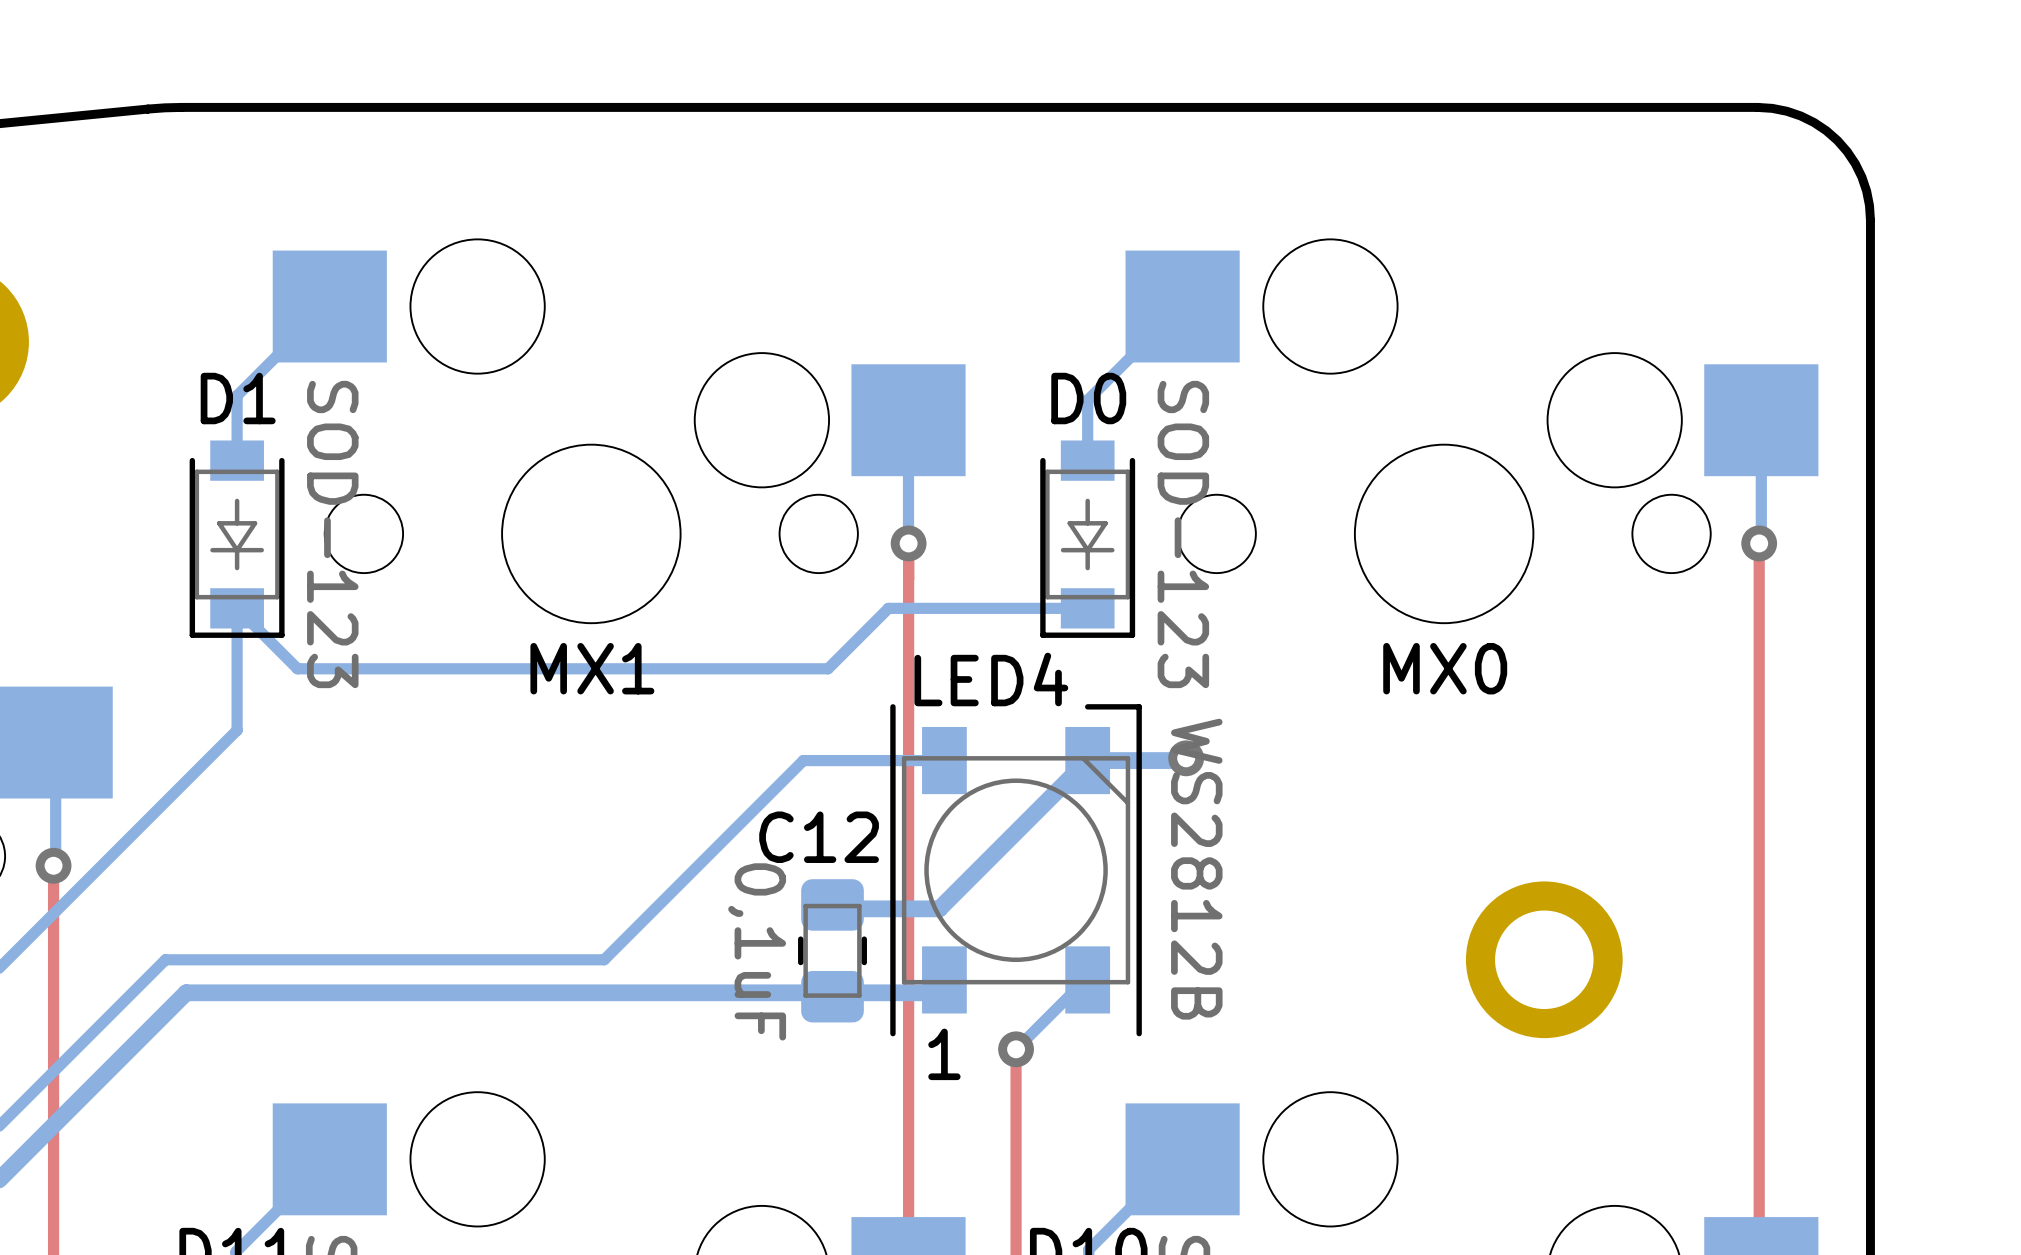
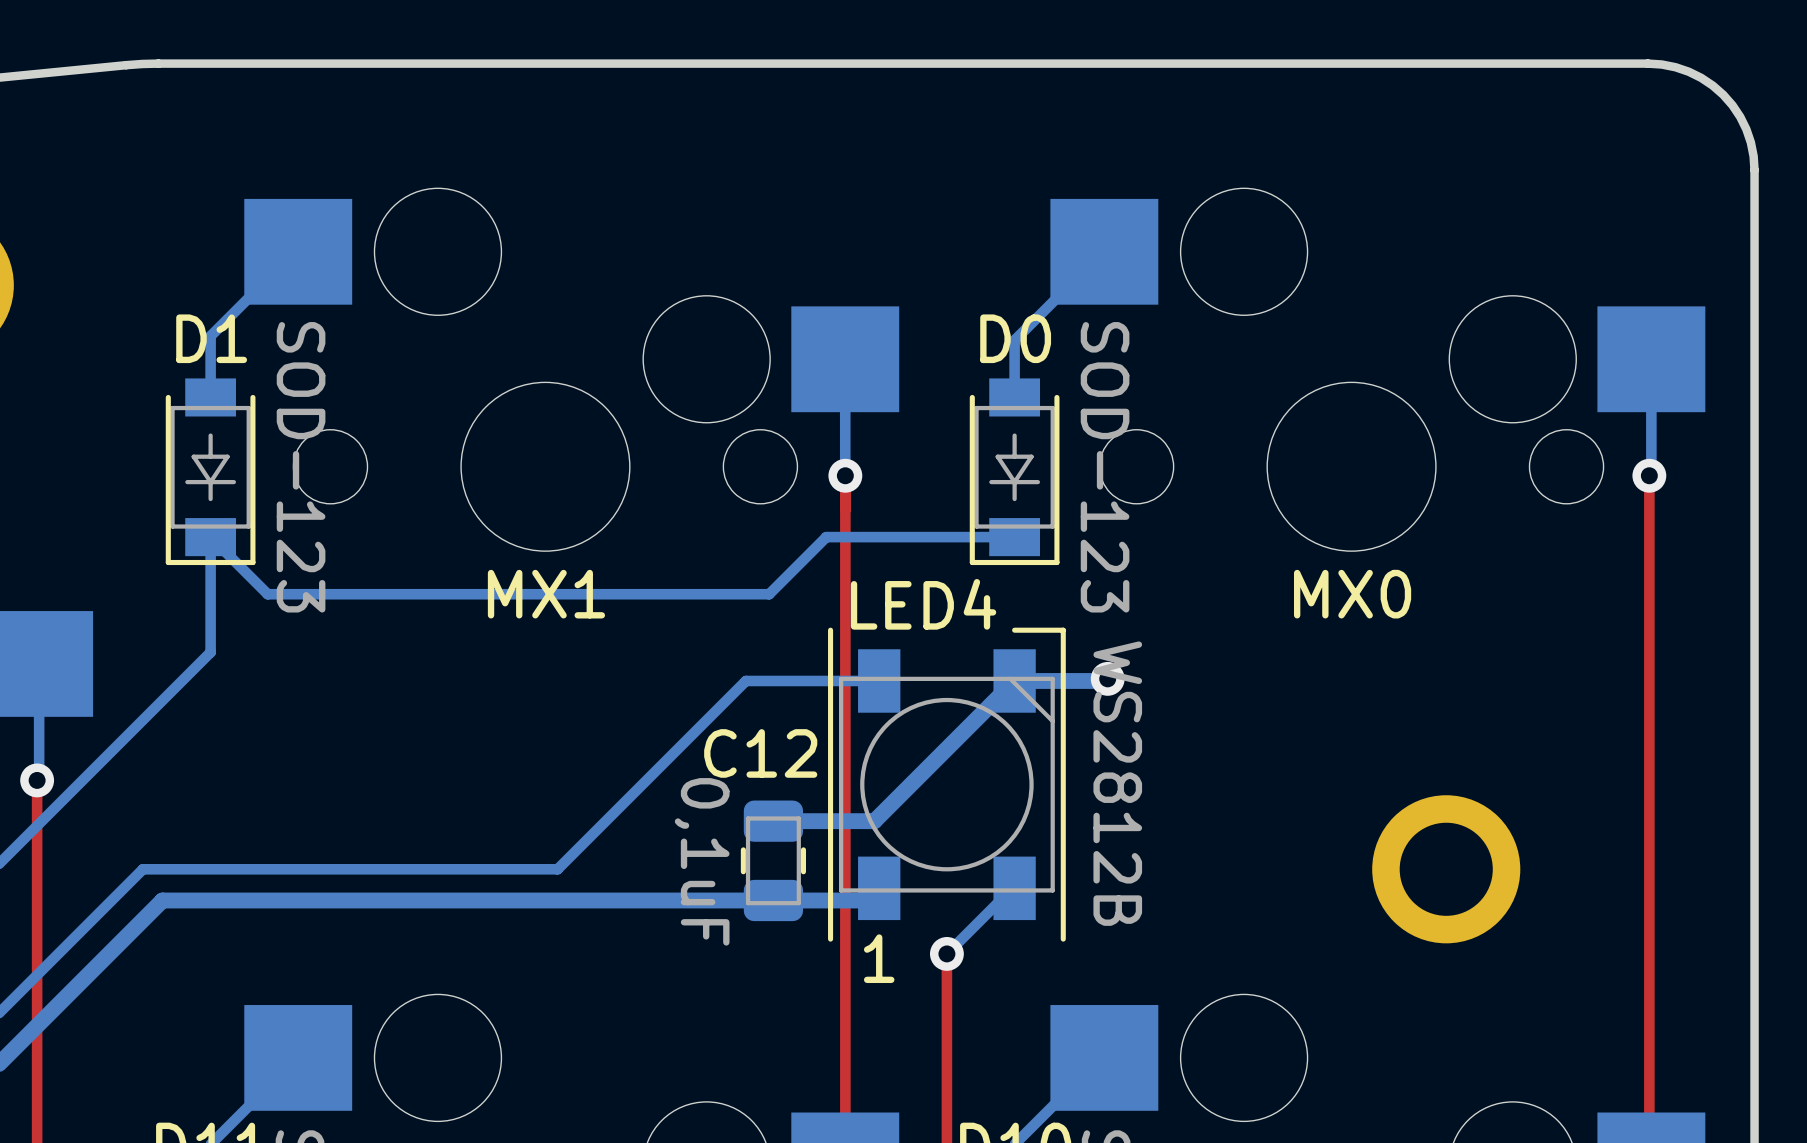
C12 footprint: [798, 879, 867, 1023] -> [740, 800, 807, 922]

